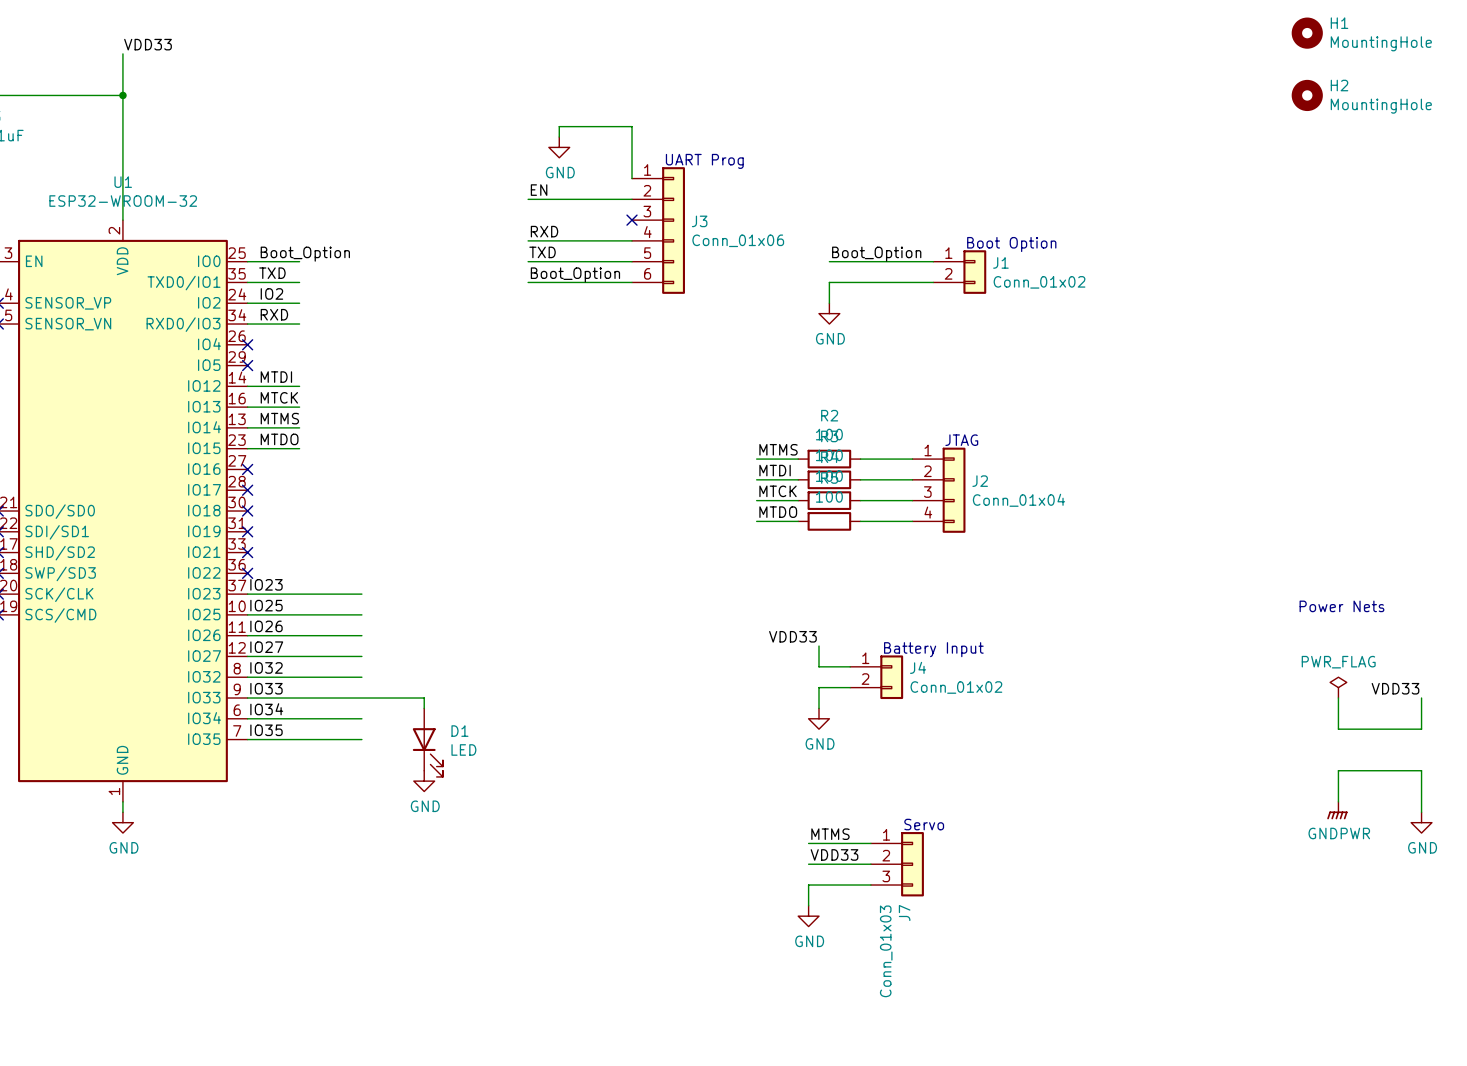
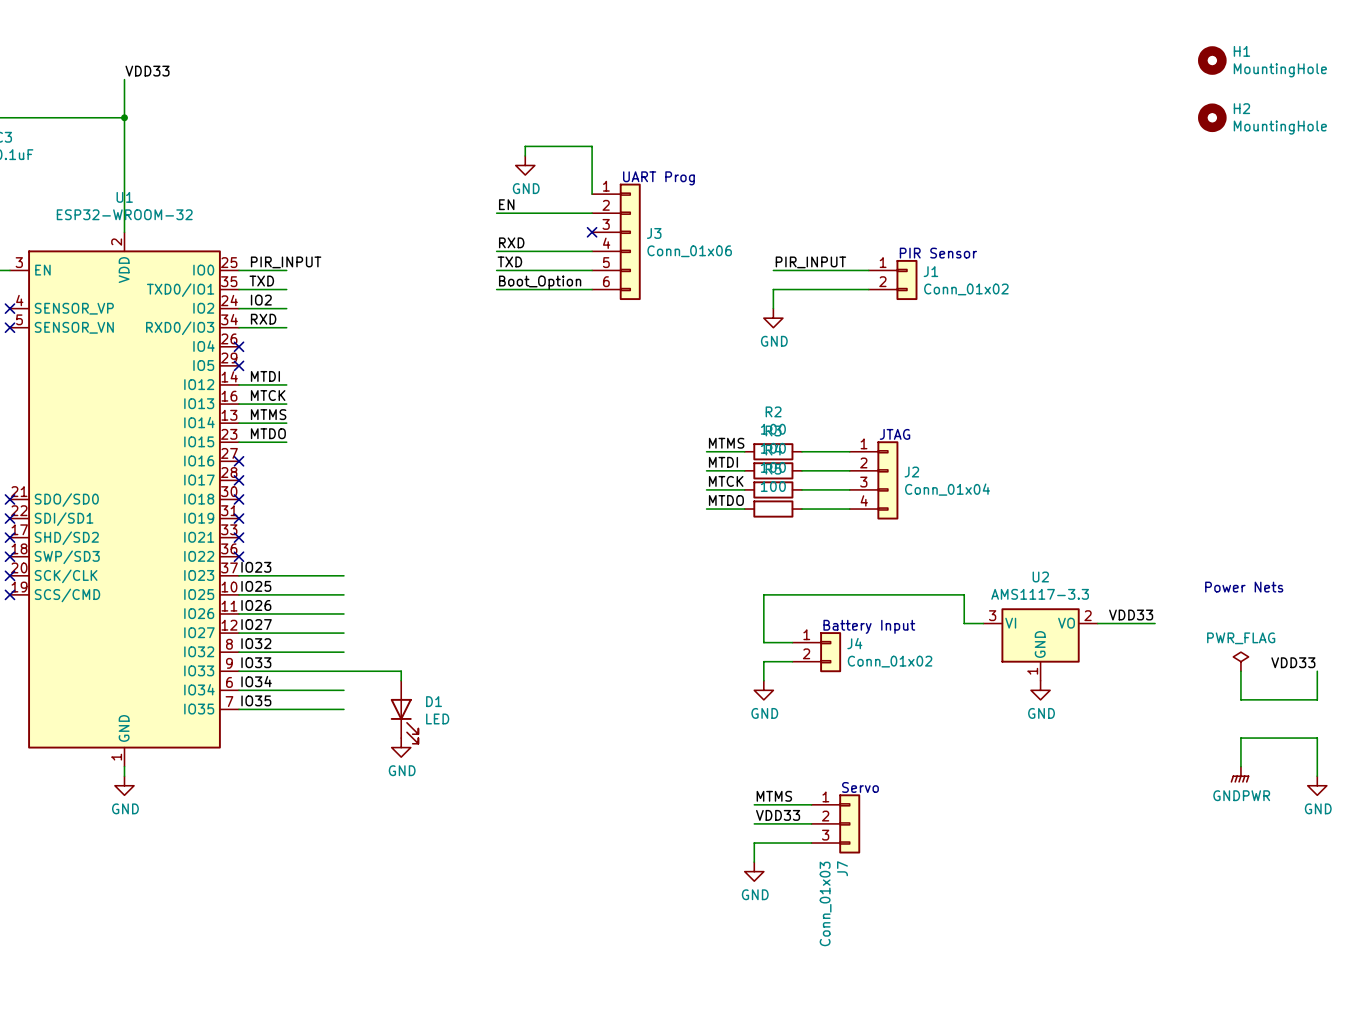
text: Boot Option (1011, 244) -> PIR Sensor (938, 253)
label: Boot_Option (305, 254) -> PIR_INPUT (286, 262)
label: Boot_Option (876, 254) -> PIR_INPUT (810, 262)
label: VDD33 (792, 636) -> none
label: none -> VDD33 (1131, 615)
wire: none -> (763, 623) (763, 594) (964, 594) (964, 623) (983, 623)
wire: none -> (1097, 623) (1155, 623)
U2: none -> AMS1117-3.3 (1040, 644)
power symbol: none -> GND (1040, 690)

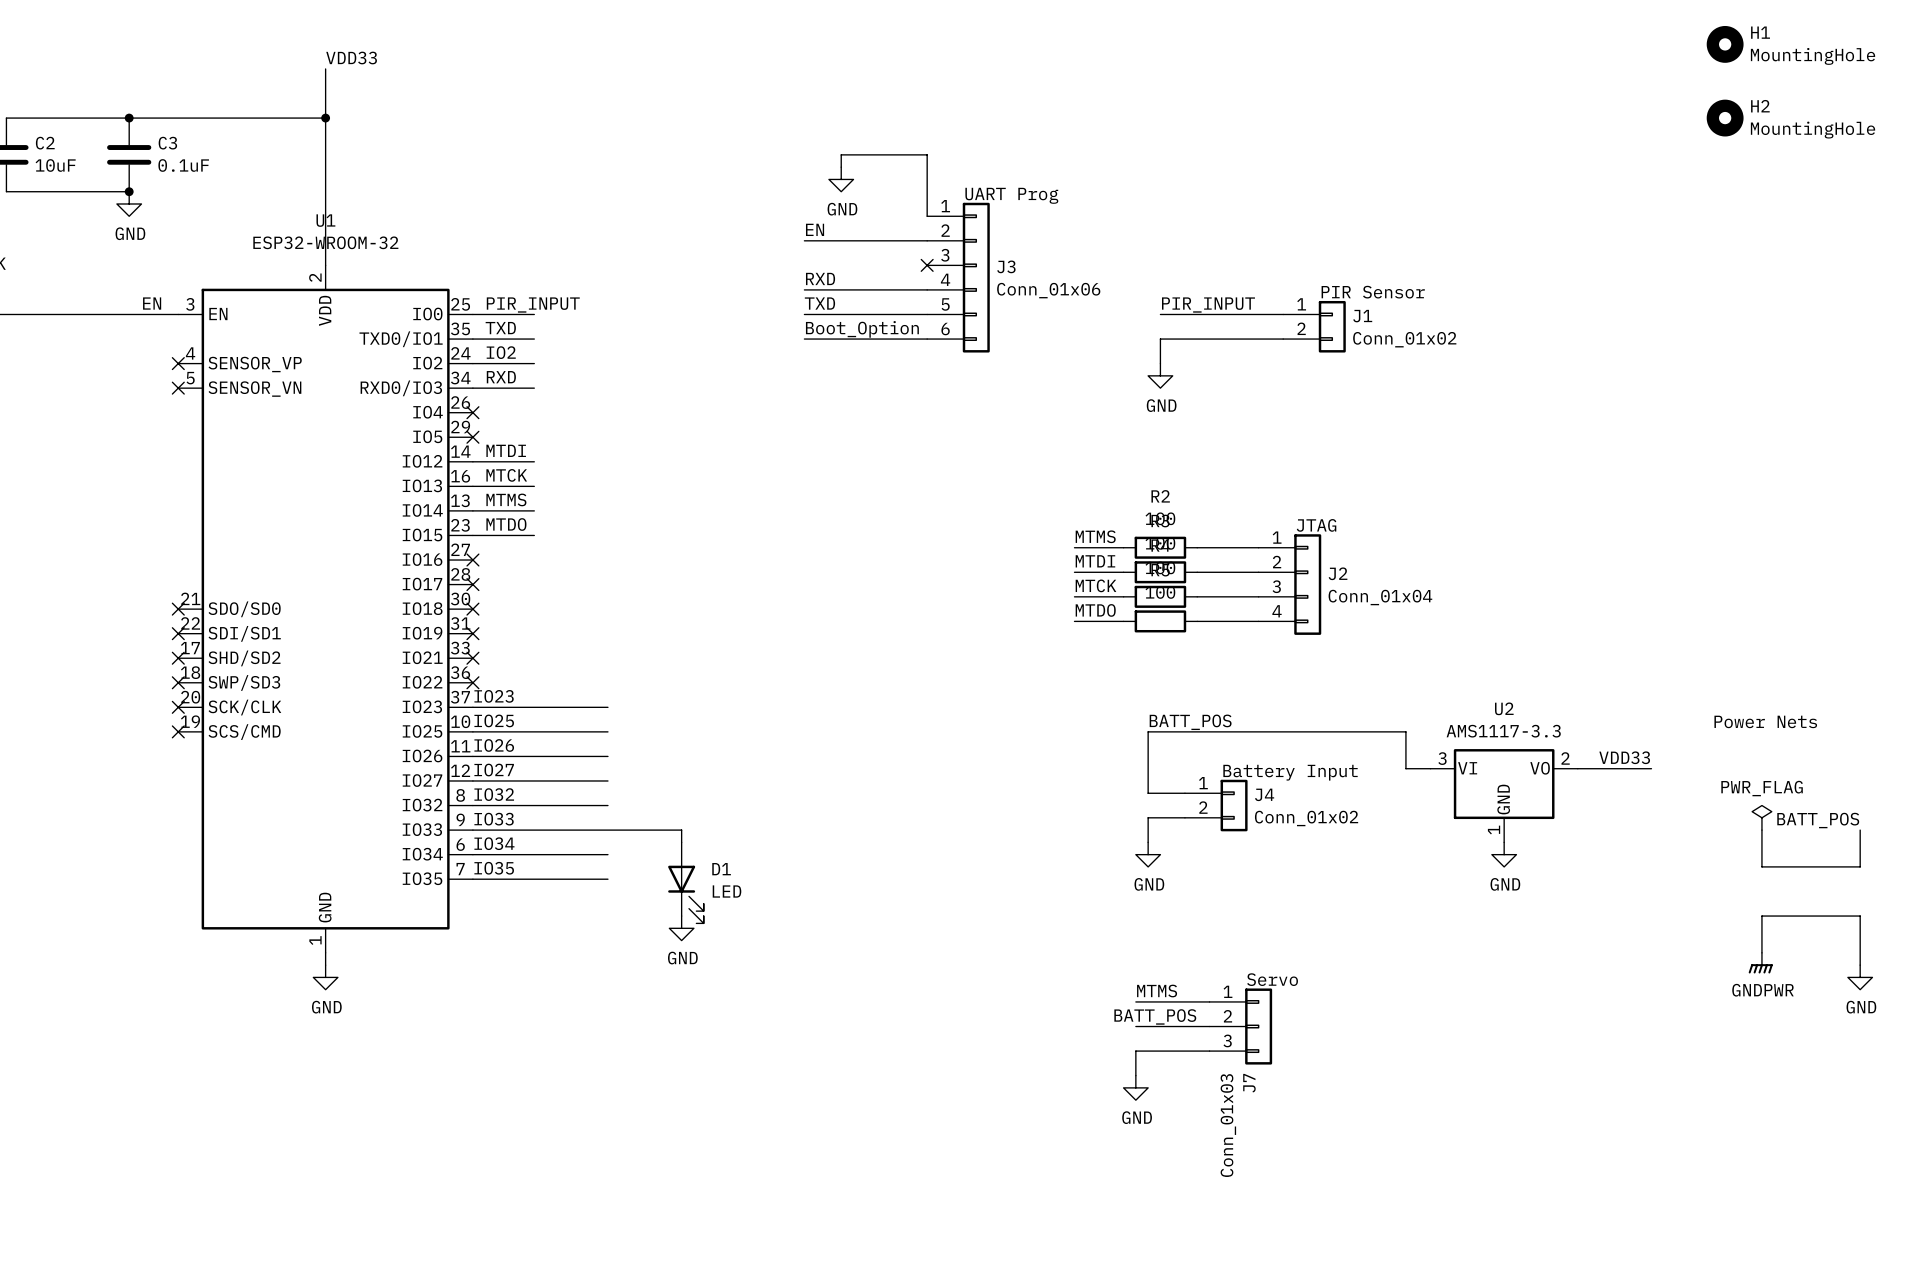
label: none -> BATT_POS (1190, 722)
label: VDD33 (1293, 662) -> BATT_POS (1818, 820)
label: VDD33 (778, 815) -> BATT_POS (1155, 1016)

